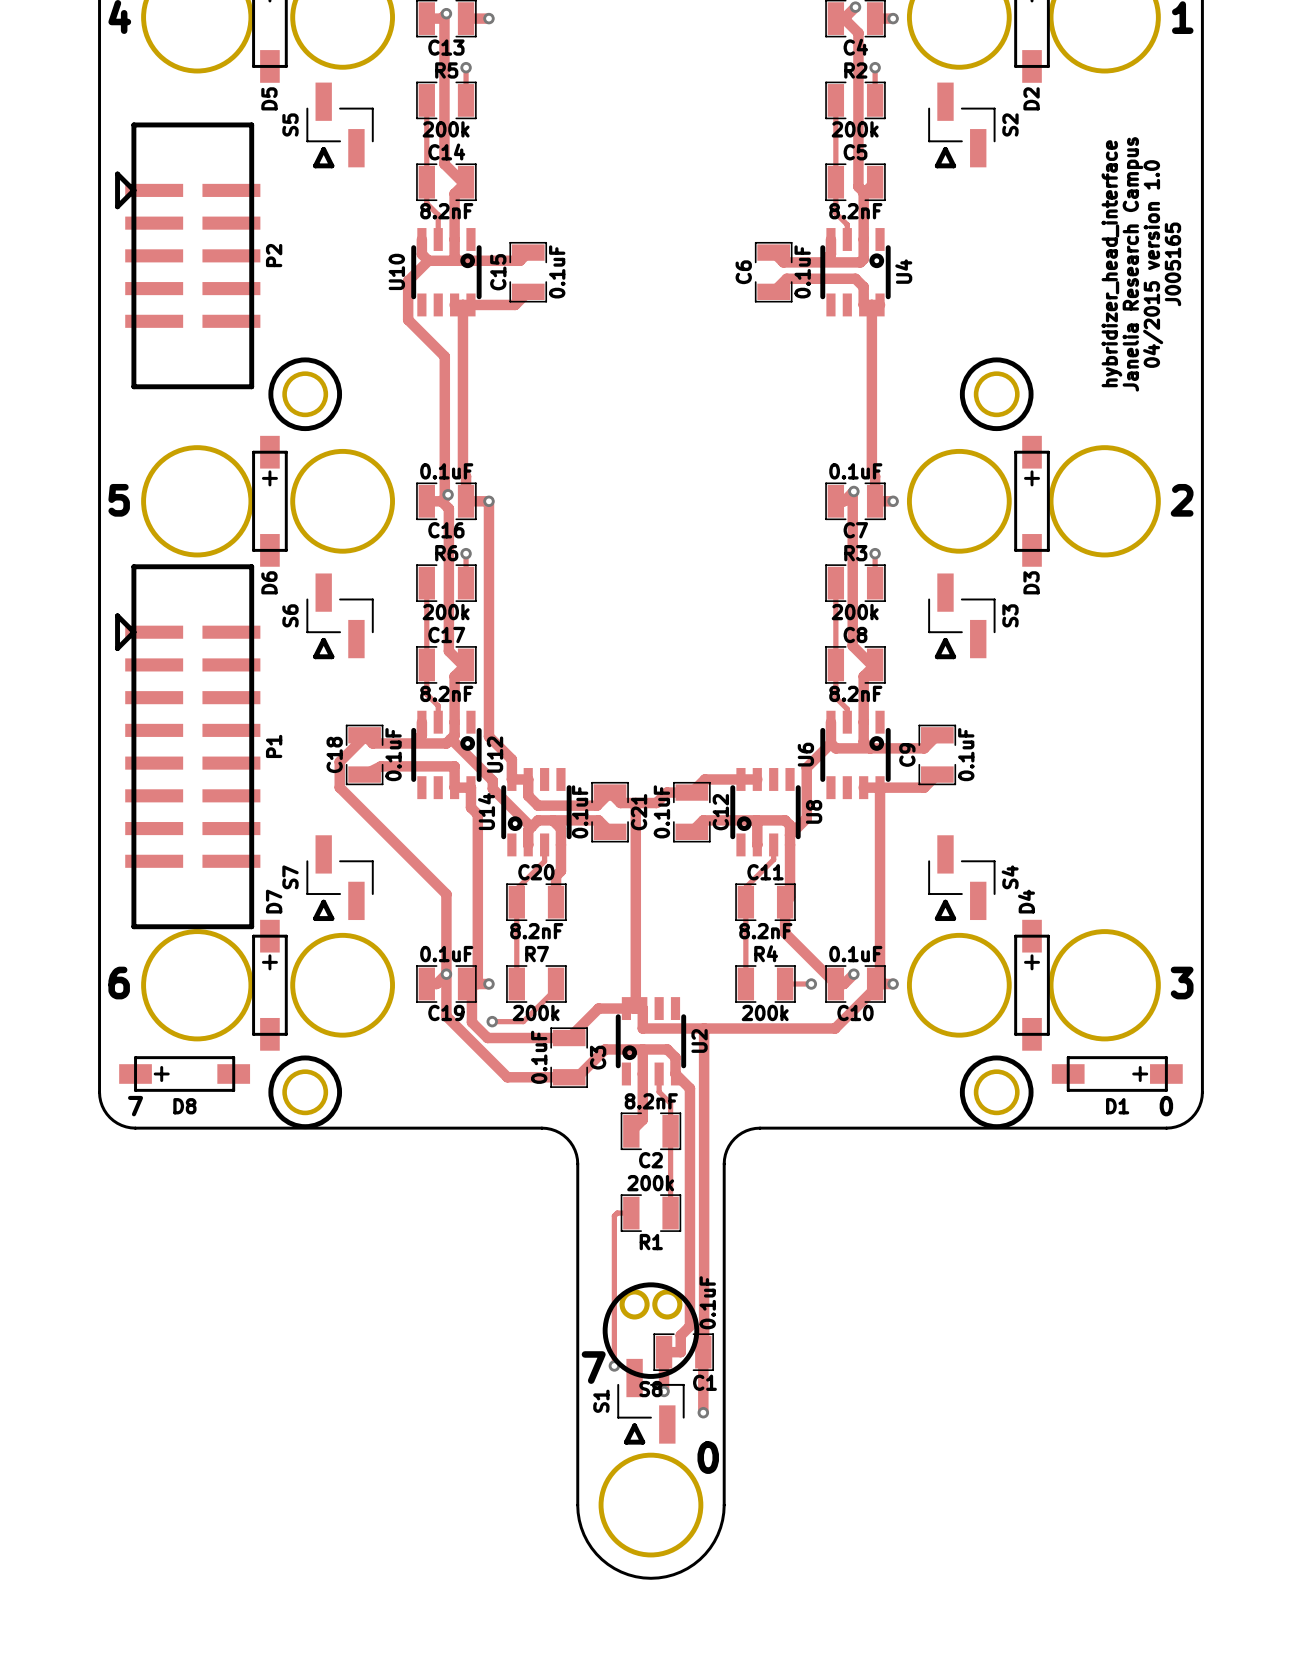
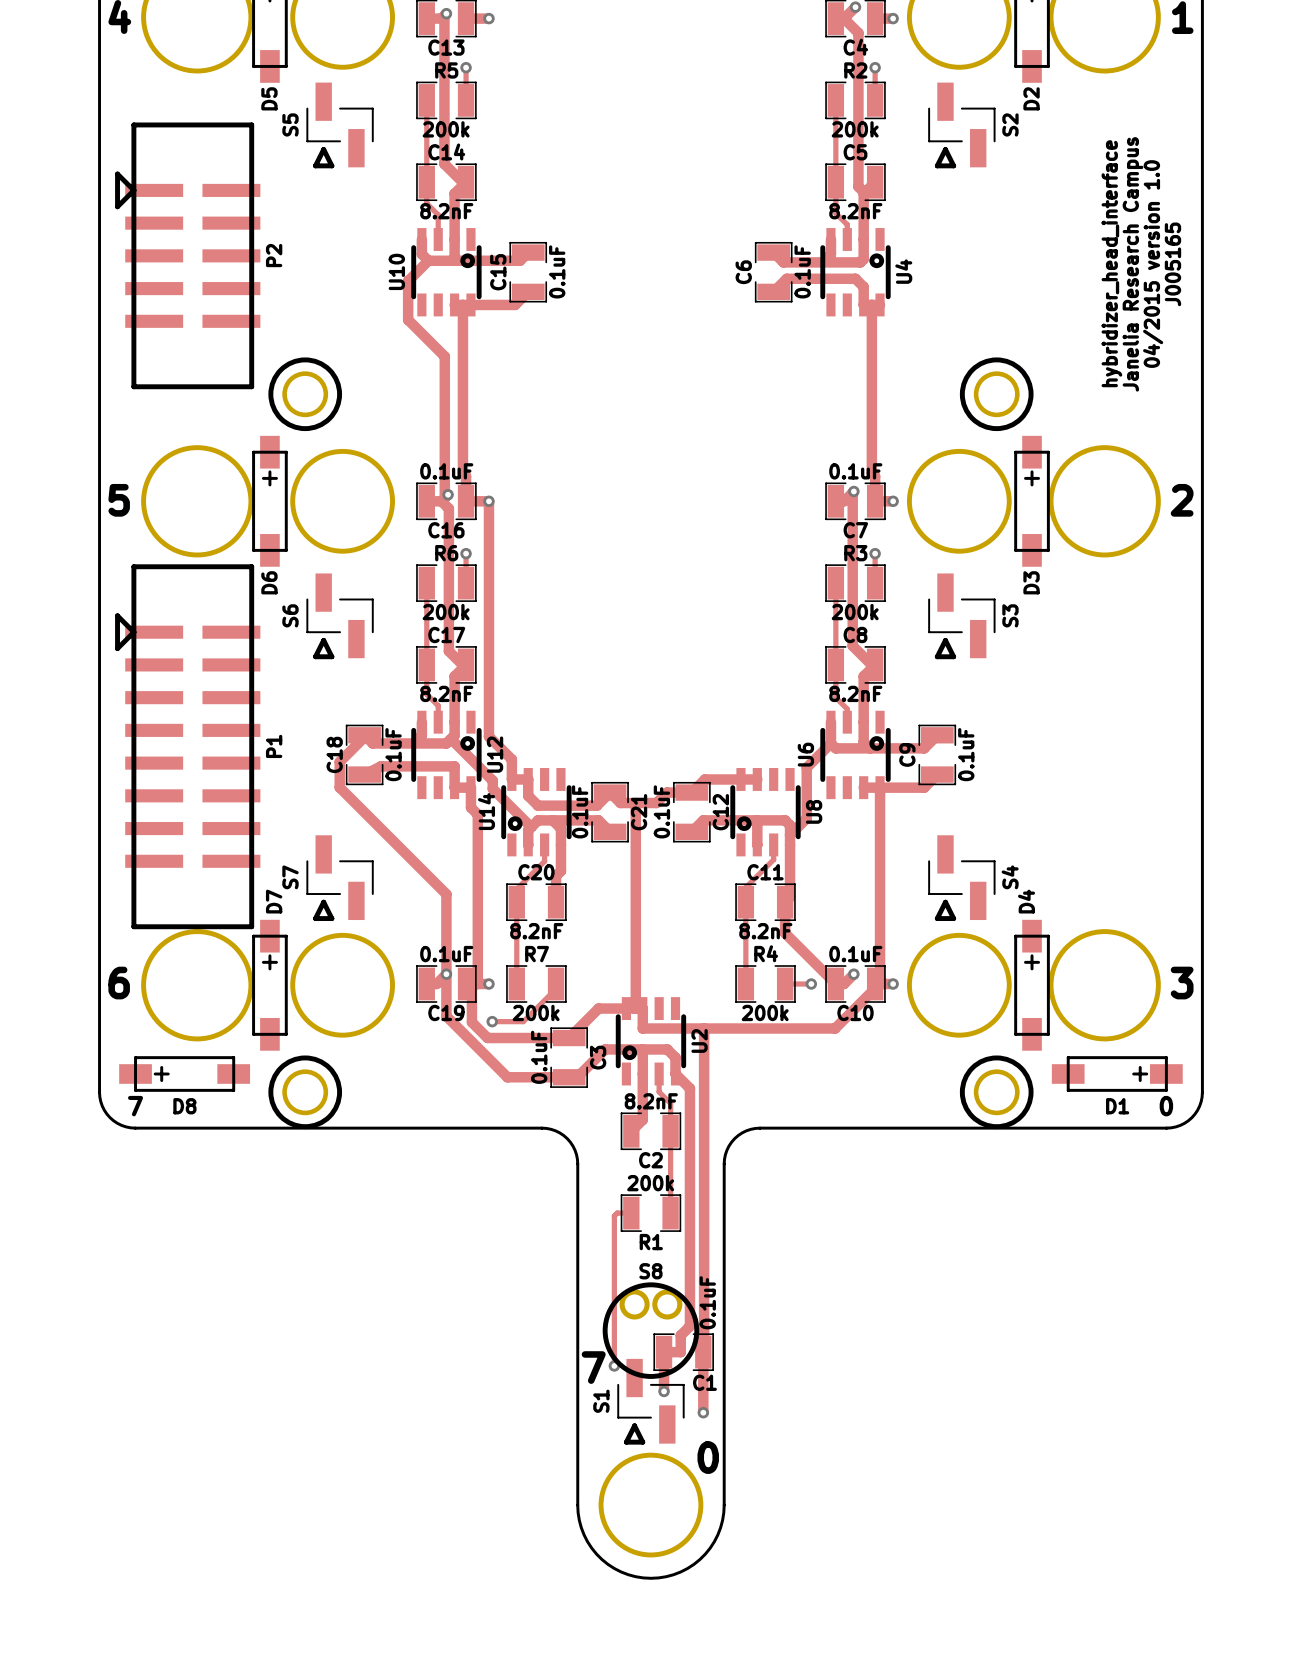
S8 name position: S8 (650, 1389) -> S8 (650, 1271)

